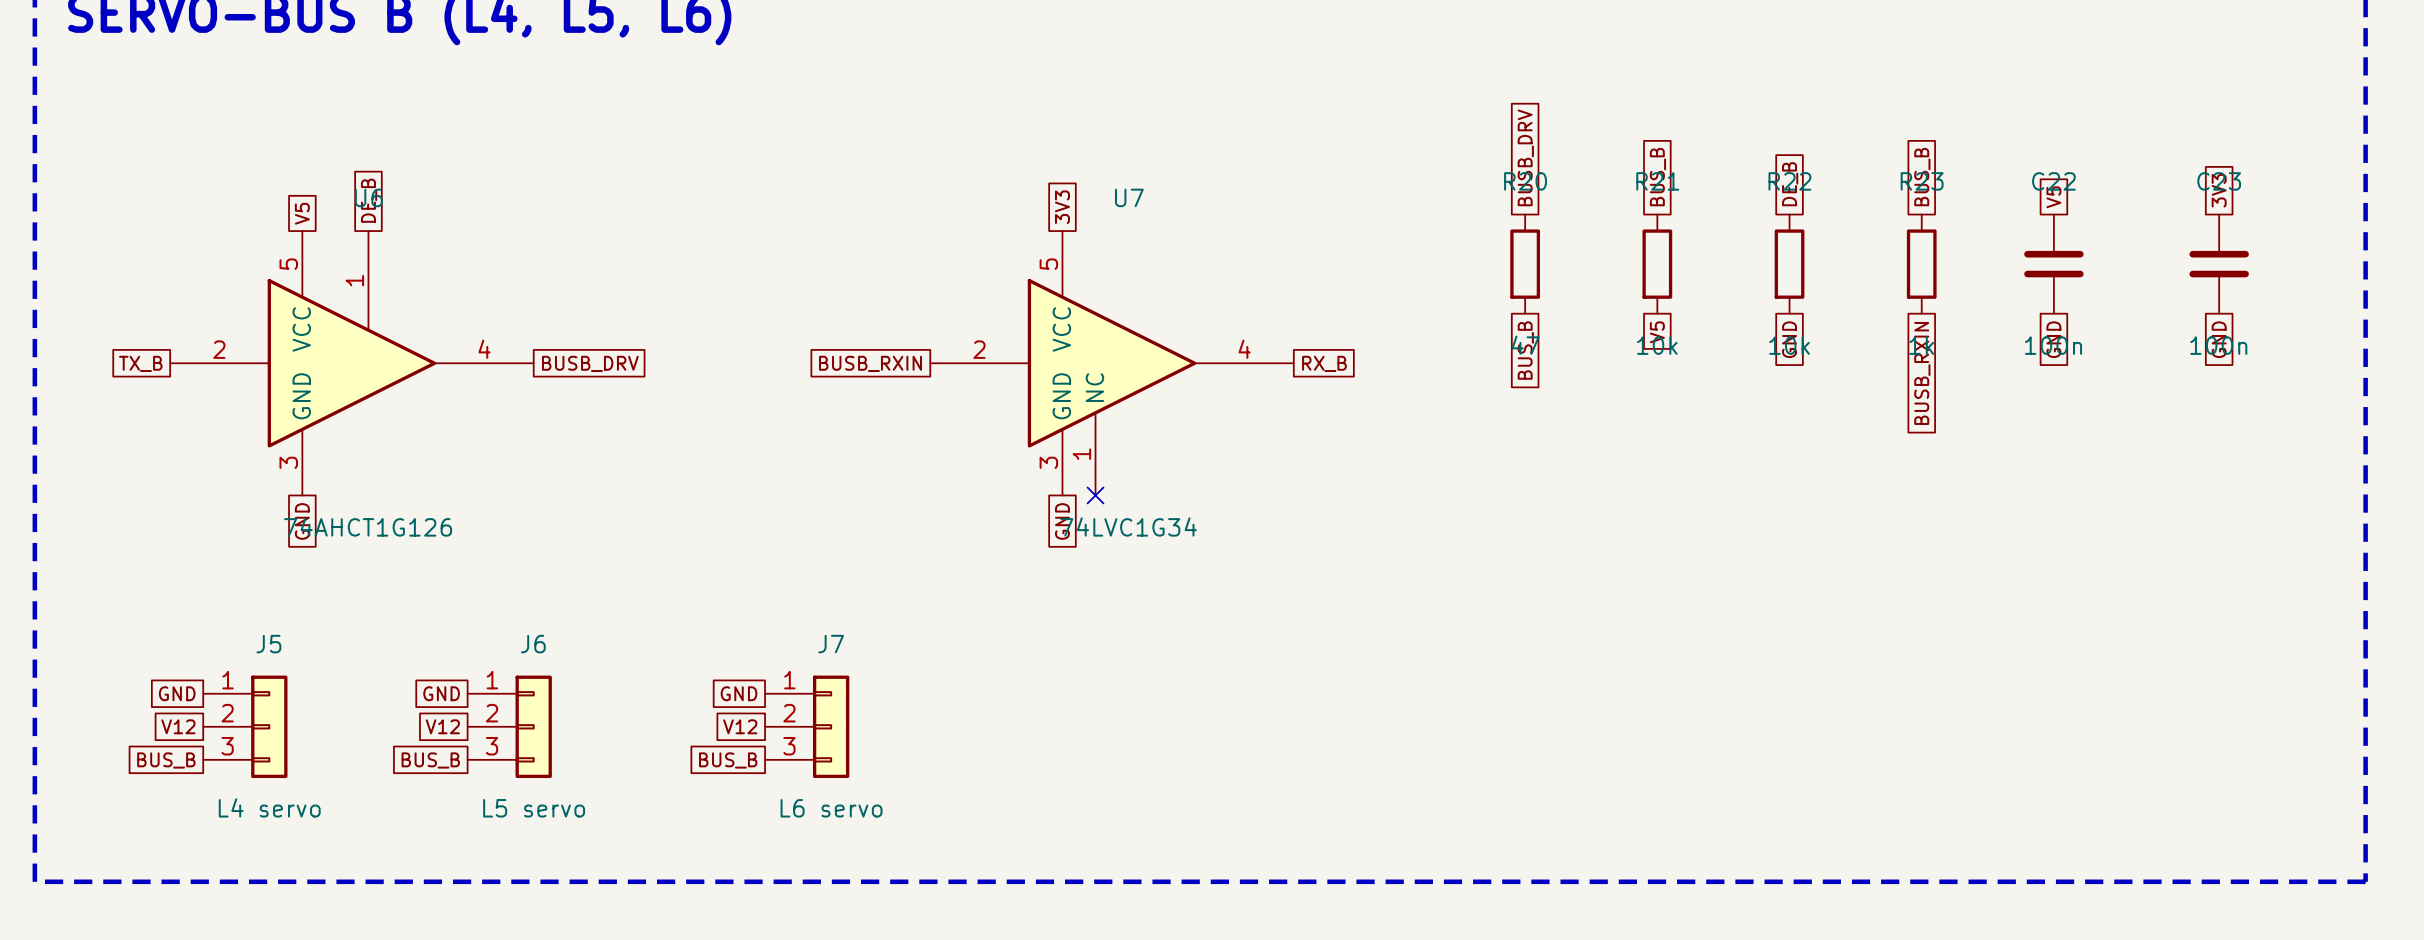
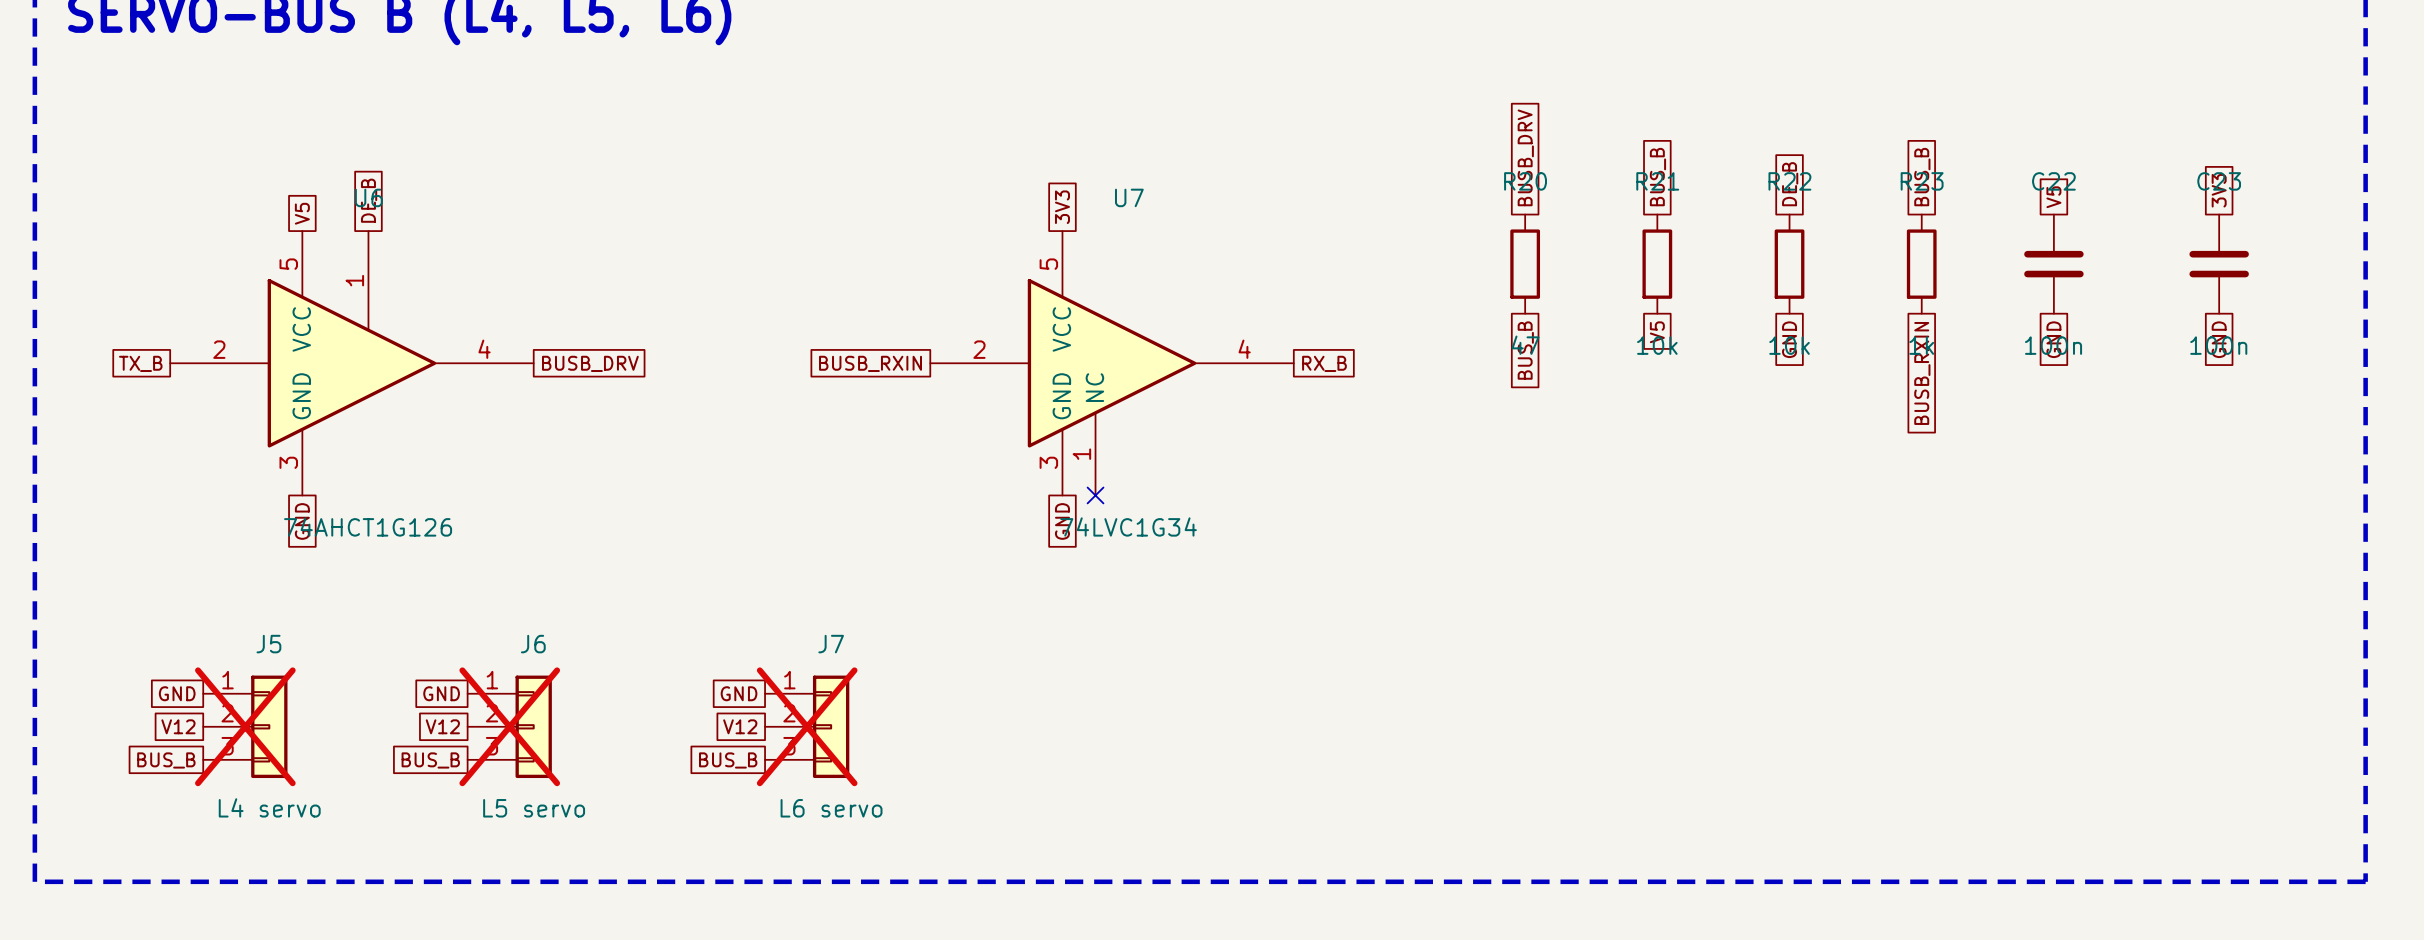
J5 do-not-place cross: none -> (245, 726)
J6 do-not-place cross: none -> (509, 726)
J7 do-not-place cross: none -> (807, 726)

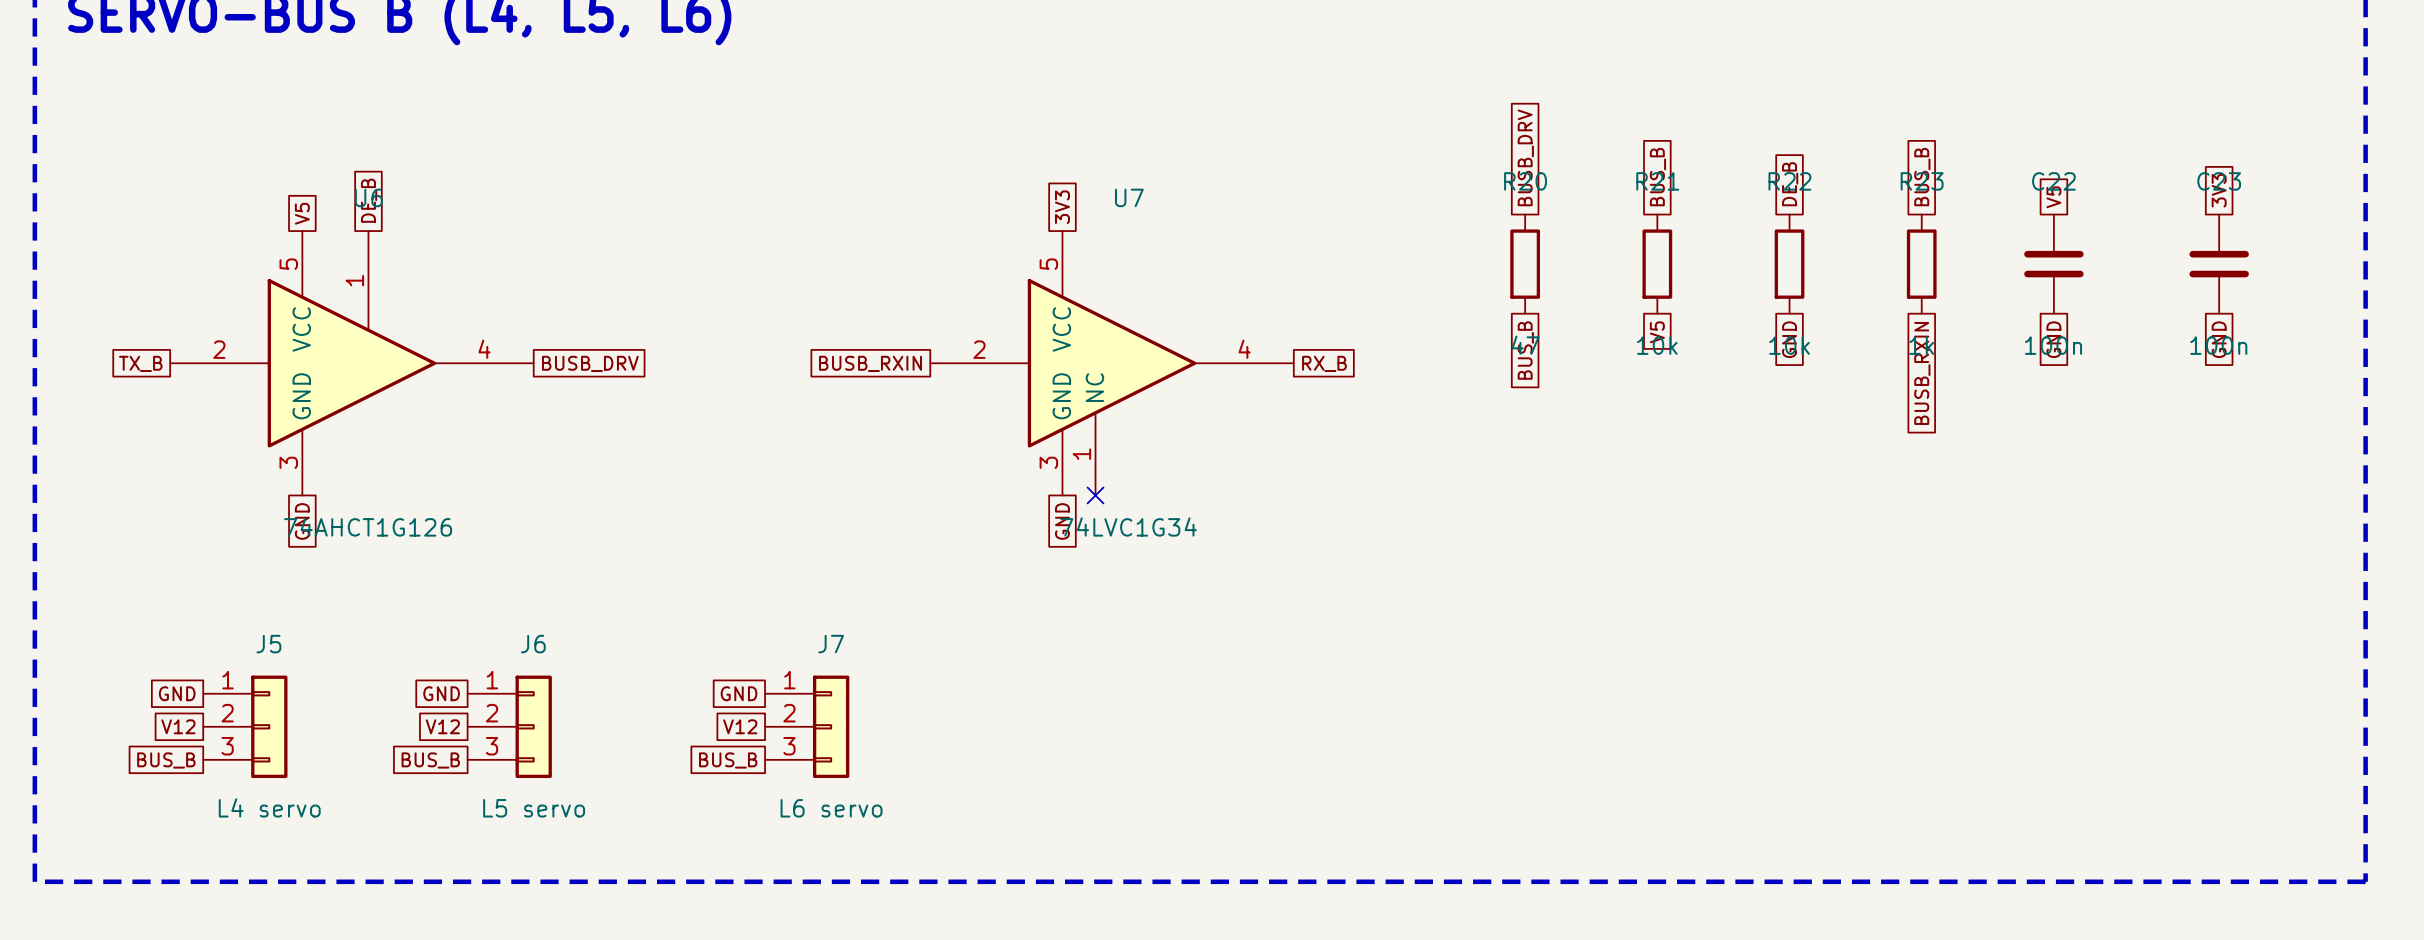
J5 do-not-place cross: (245, 726) -> none
J6 do-not-place cross: (509, 726) -> none
J7 do-not-place cross: (807, 726) -> none

